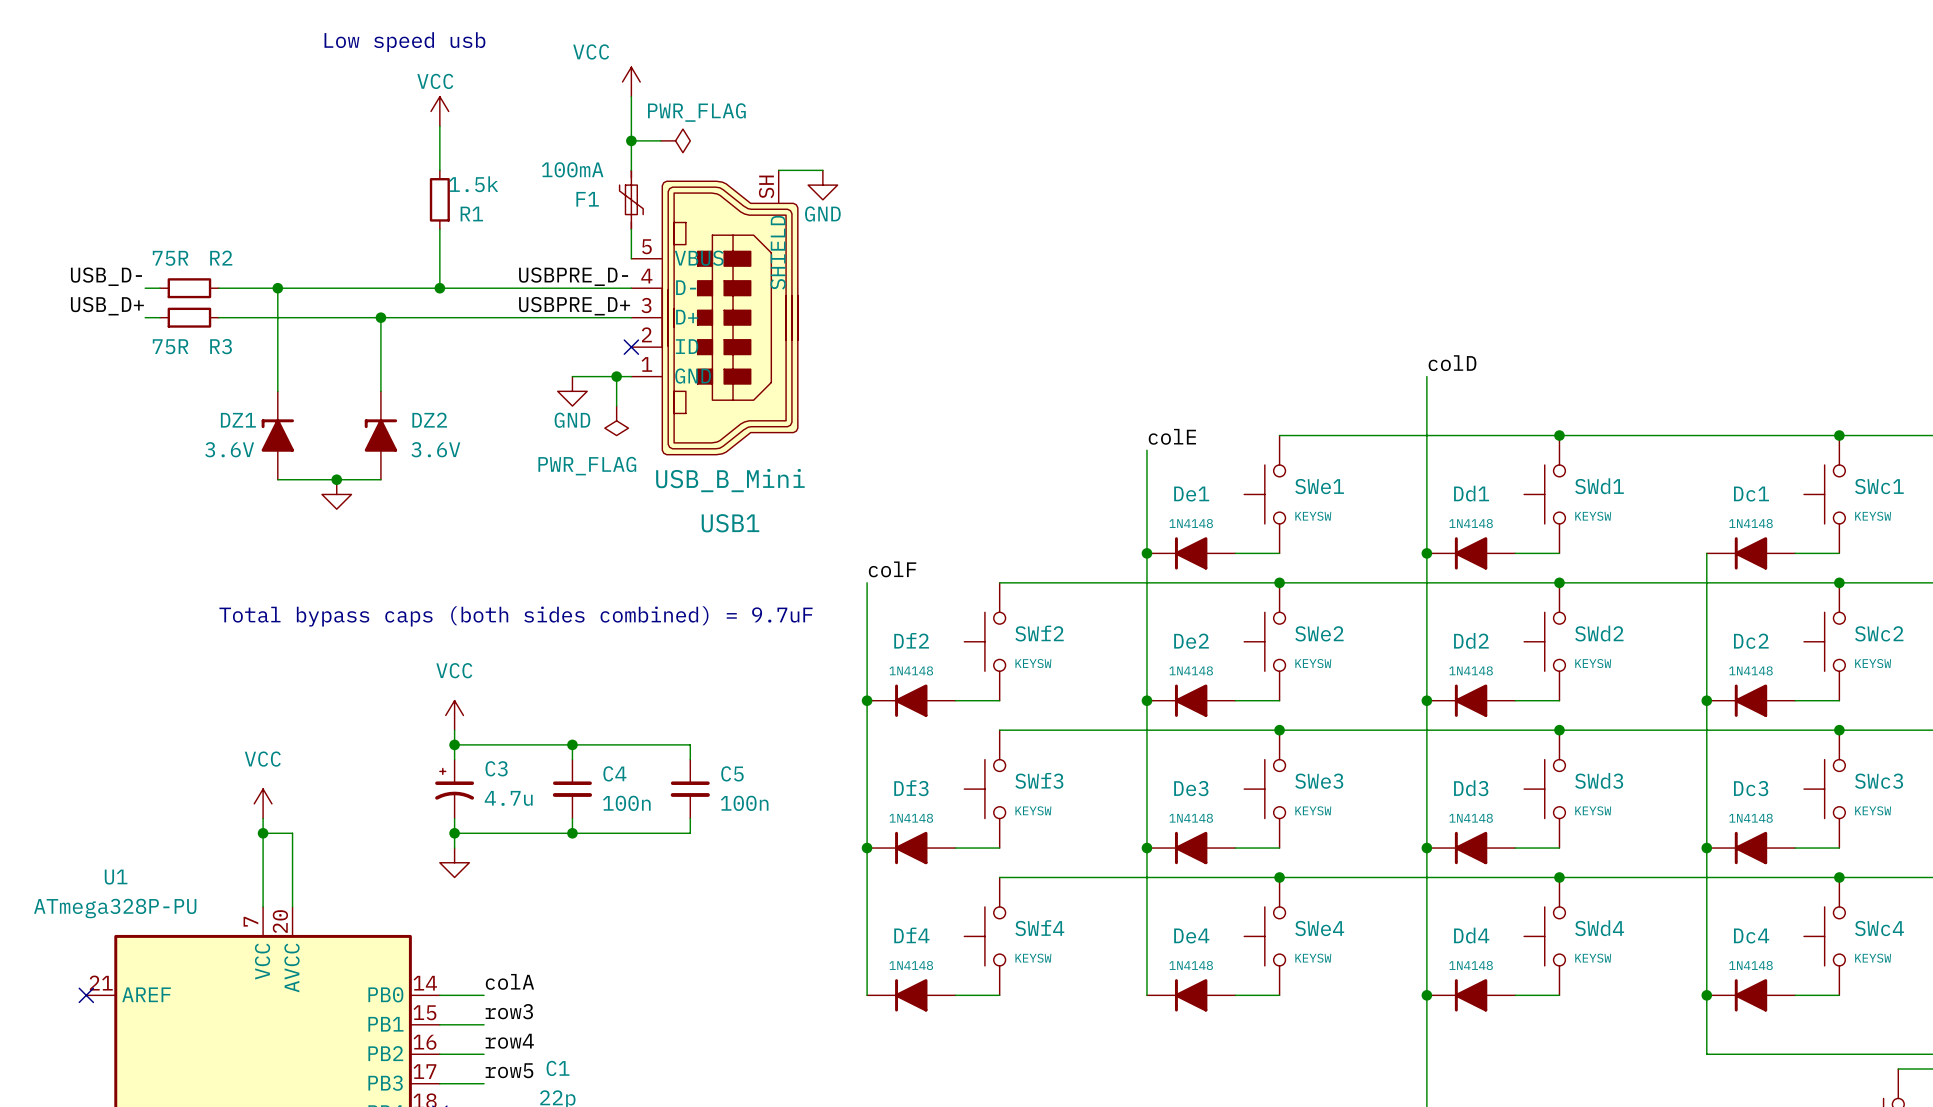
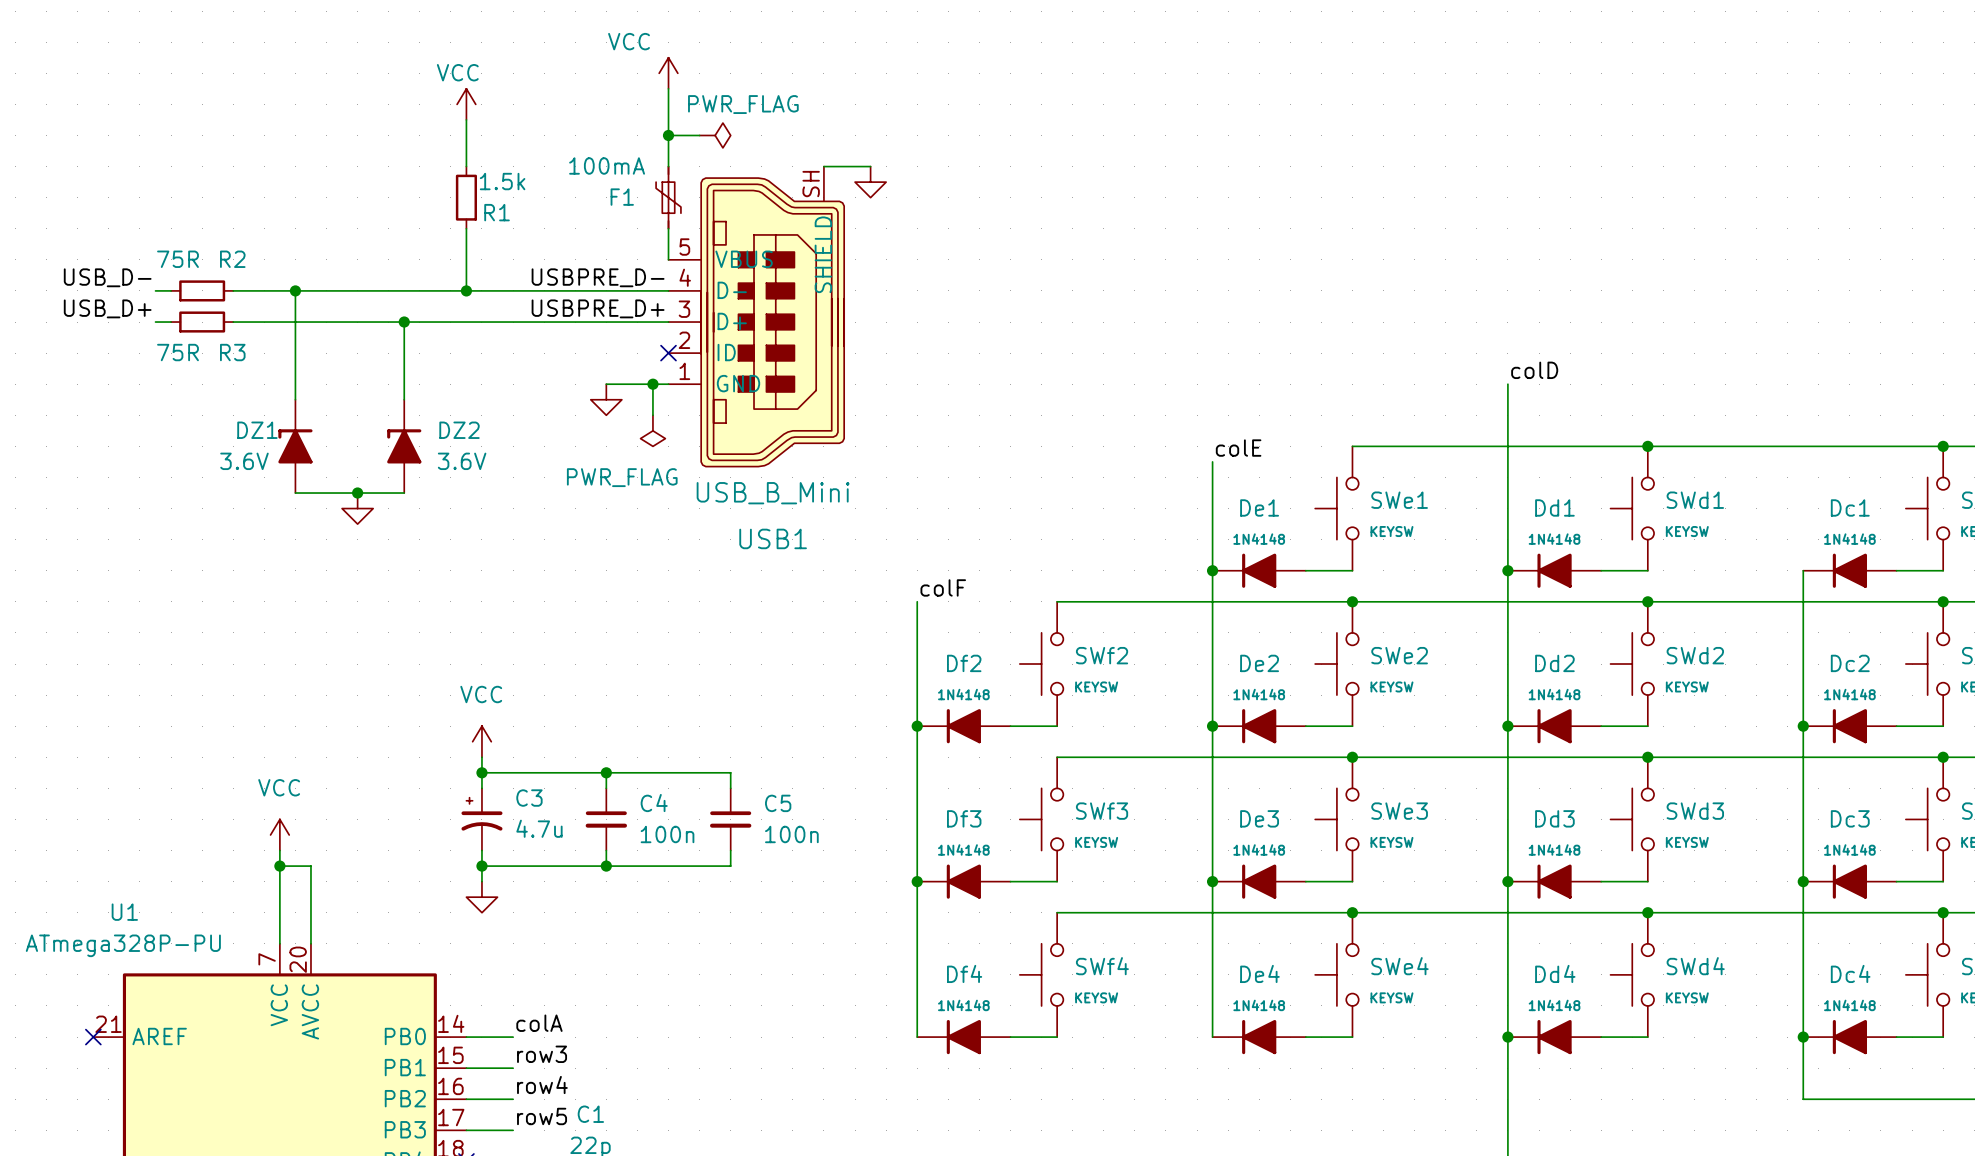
text: Low speed usb (404, 42) -> none
power symbol text: GND (822, 214) -> none
power symbol text: GND (572, 420) -> none
text: Total bypass caps (both sides combined) = 9.7uF (516, 616) -> none

